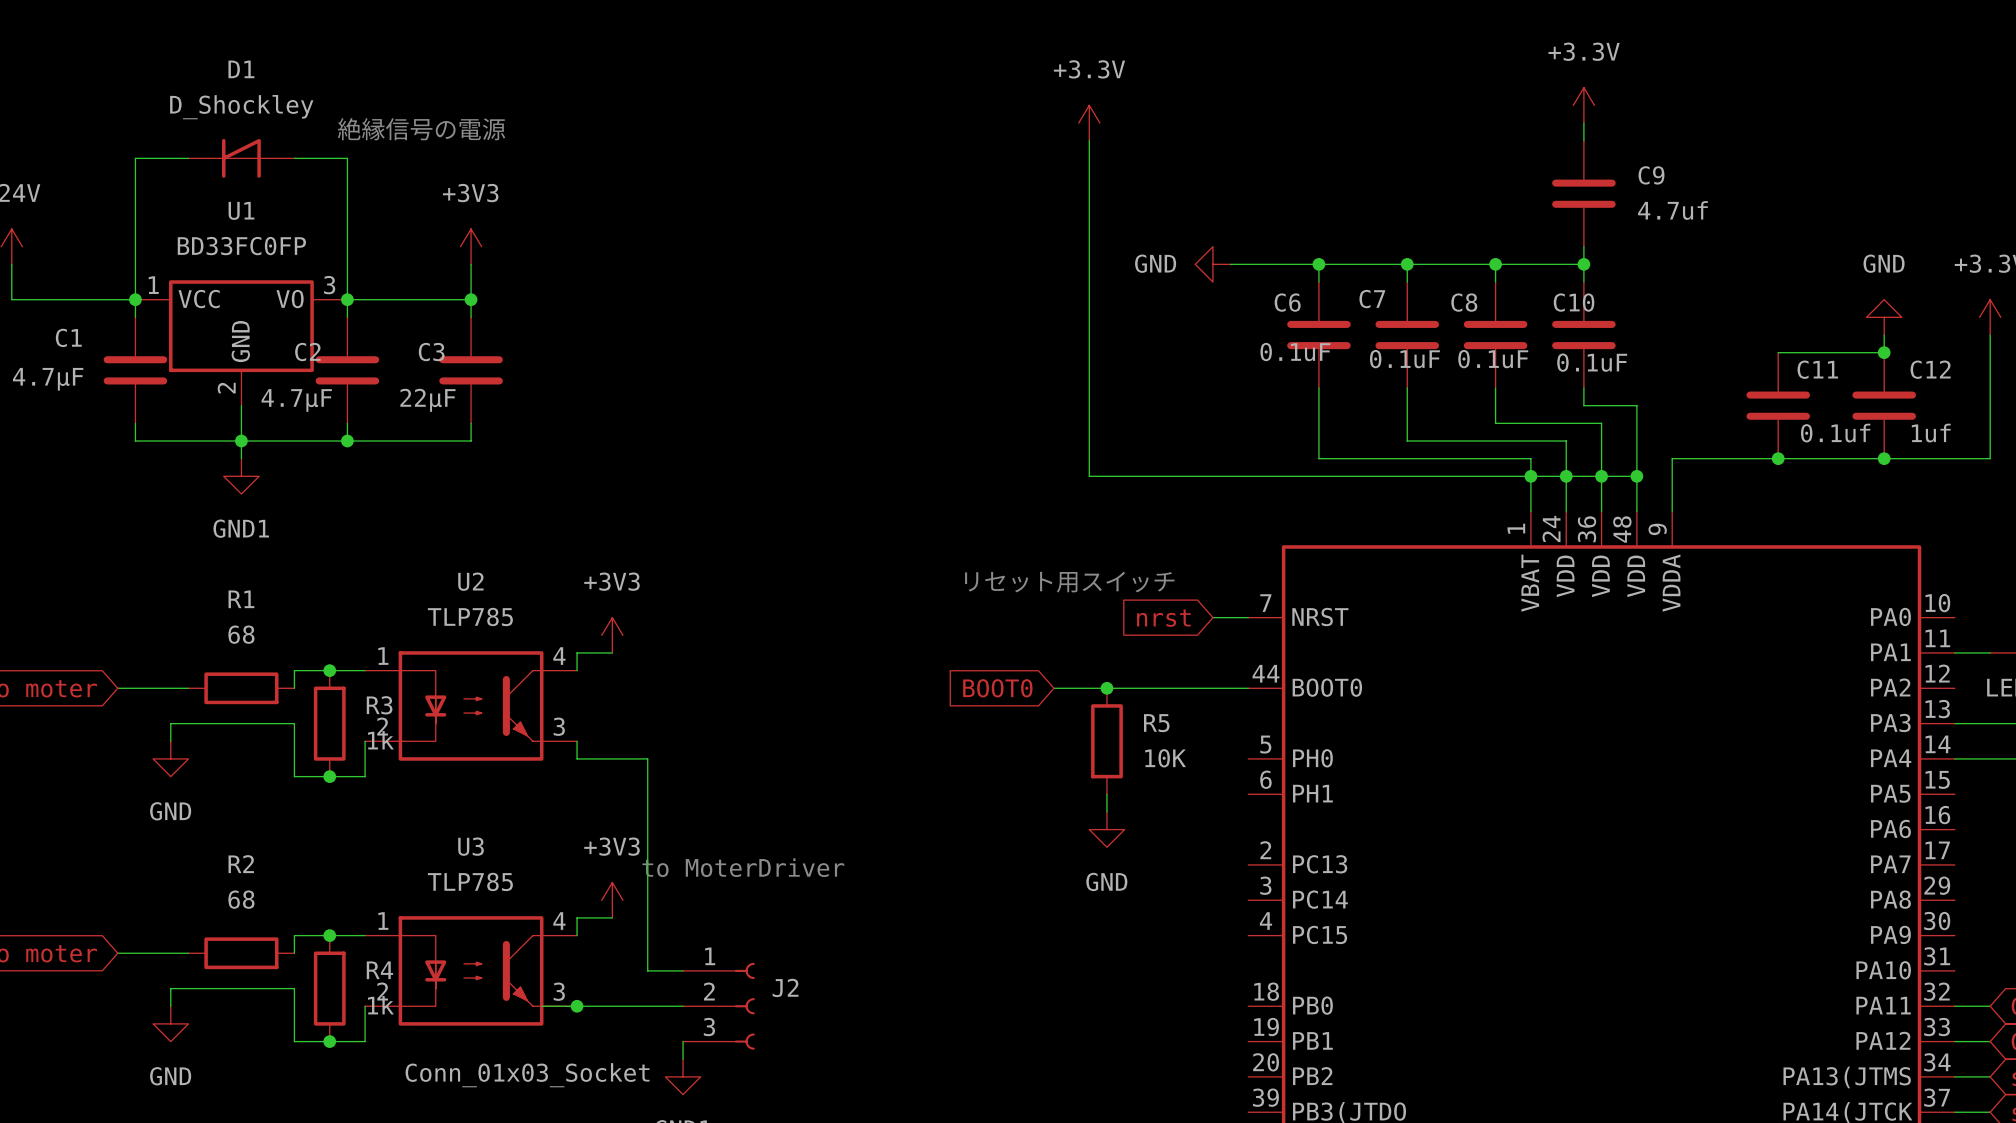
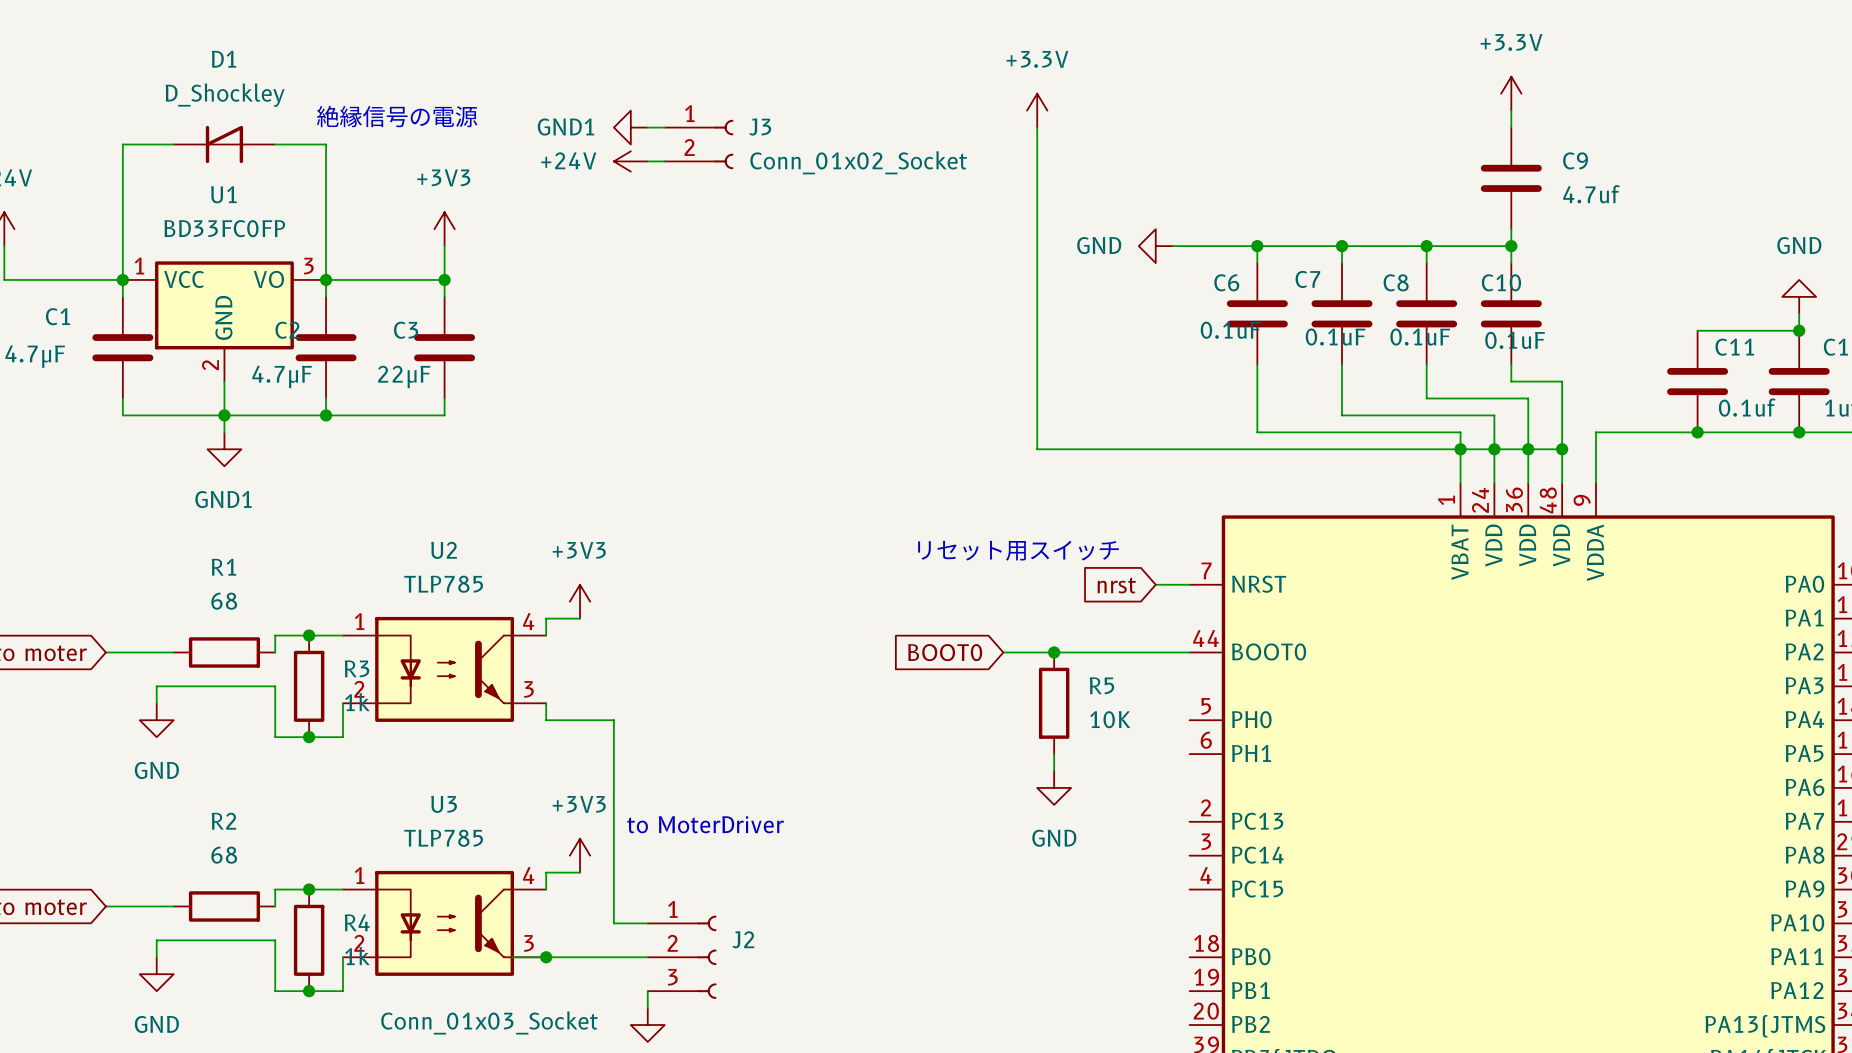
power symbol: none -> GND1 (630, 127)
wire: none -> (647, 127) (664, 127)
J3: none -> Conn_01x02_Socket (699, 144)
power symbol: none -> +24V (630, 161)
wire: none -> (647, 161) (664, 161)

